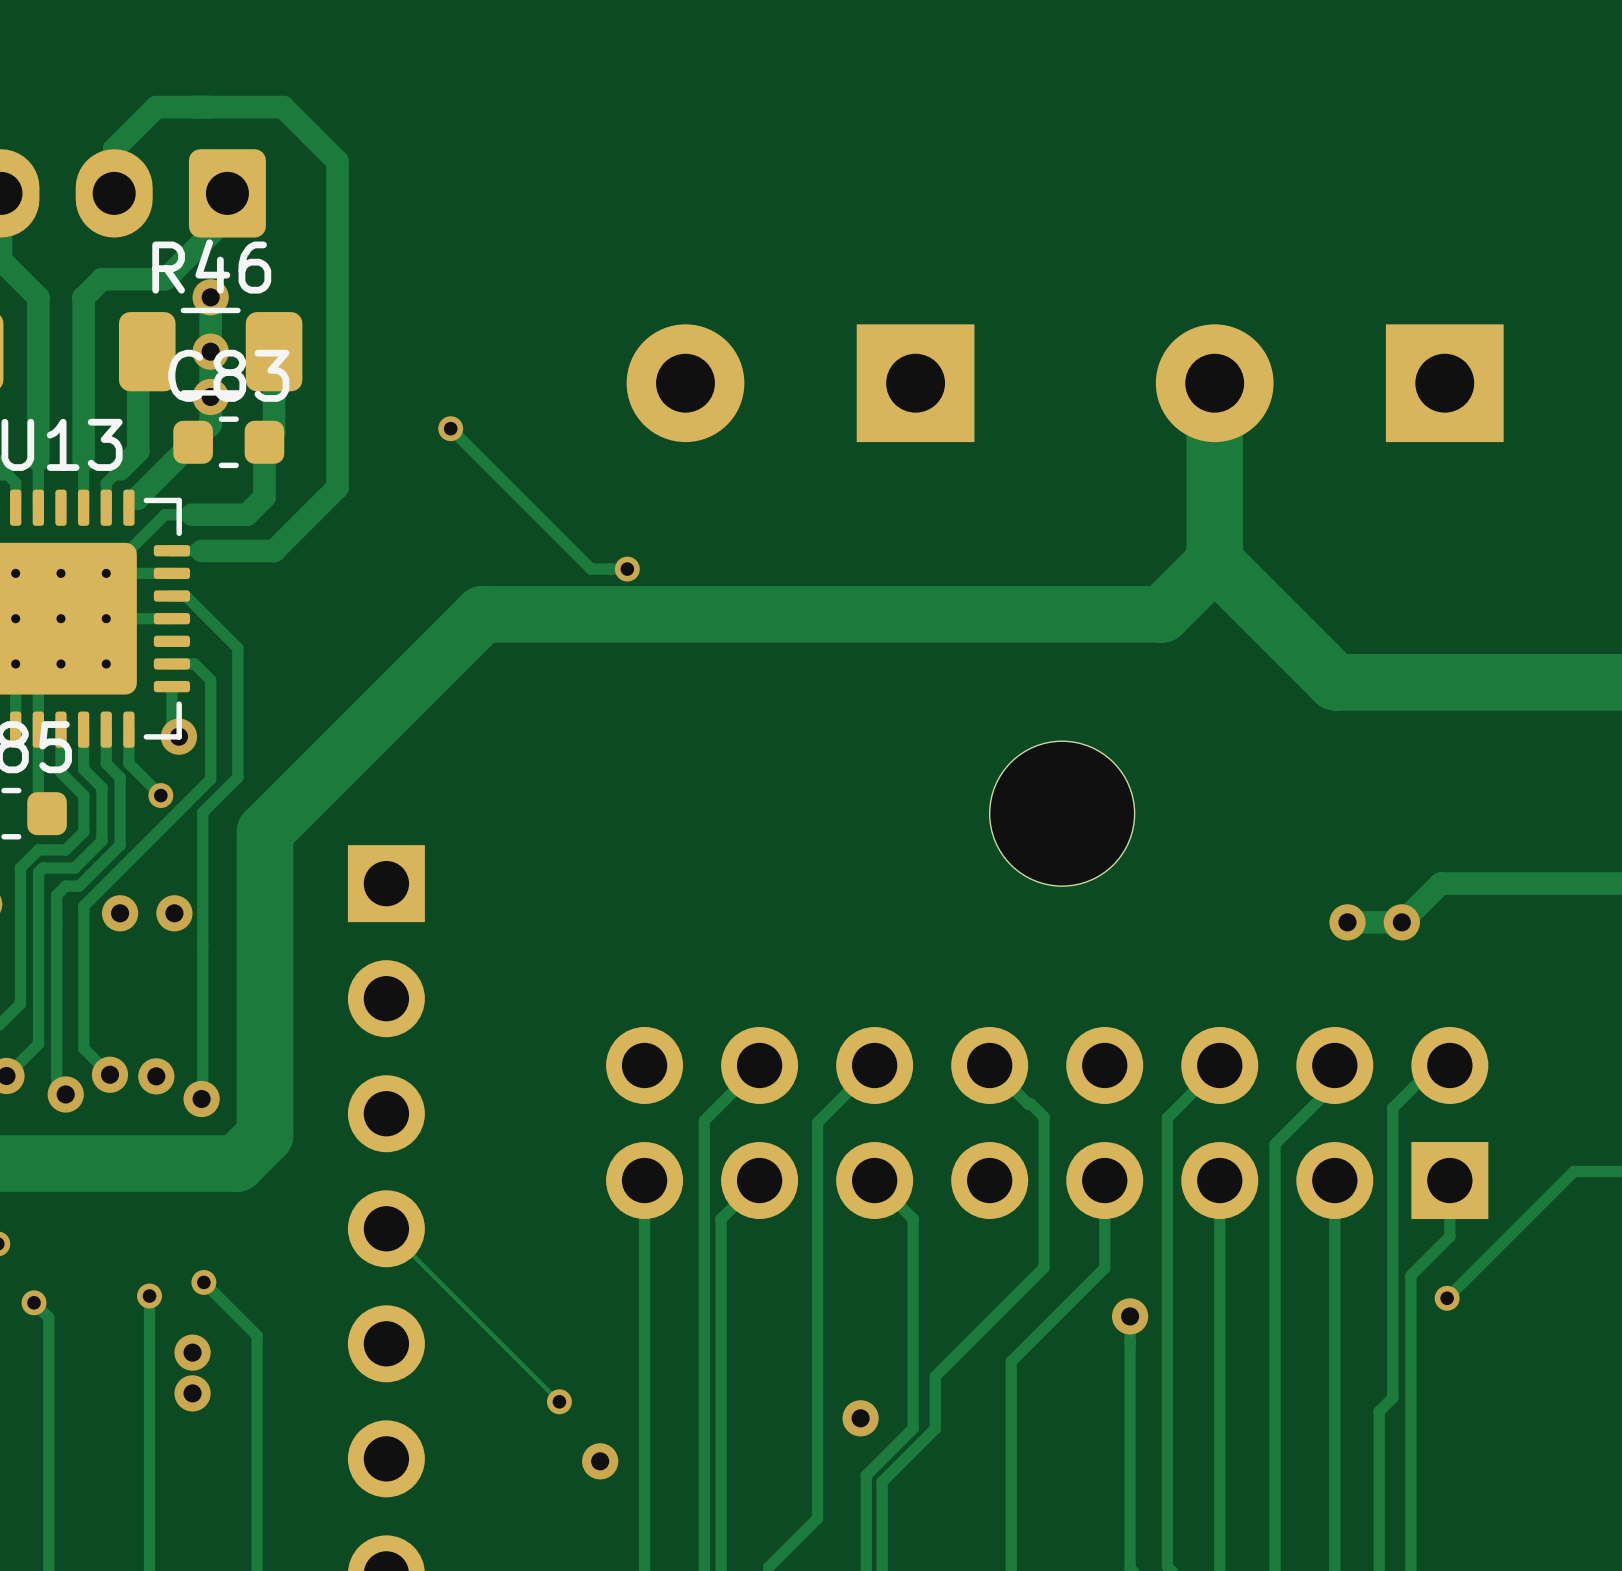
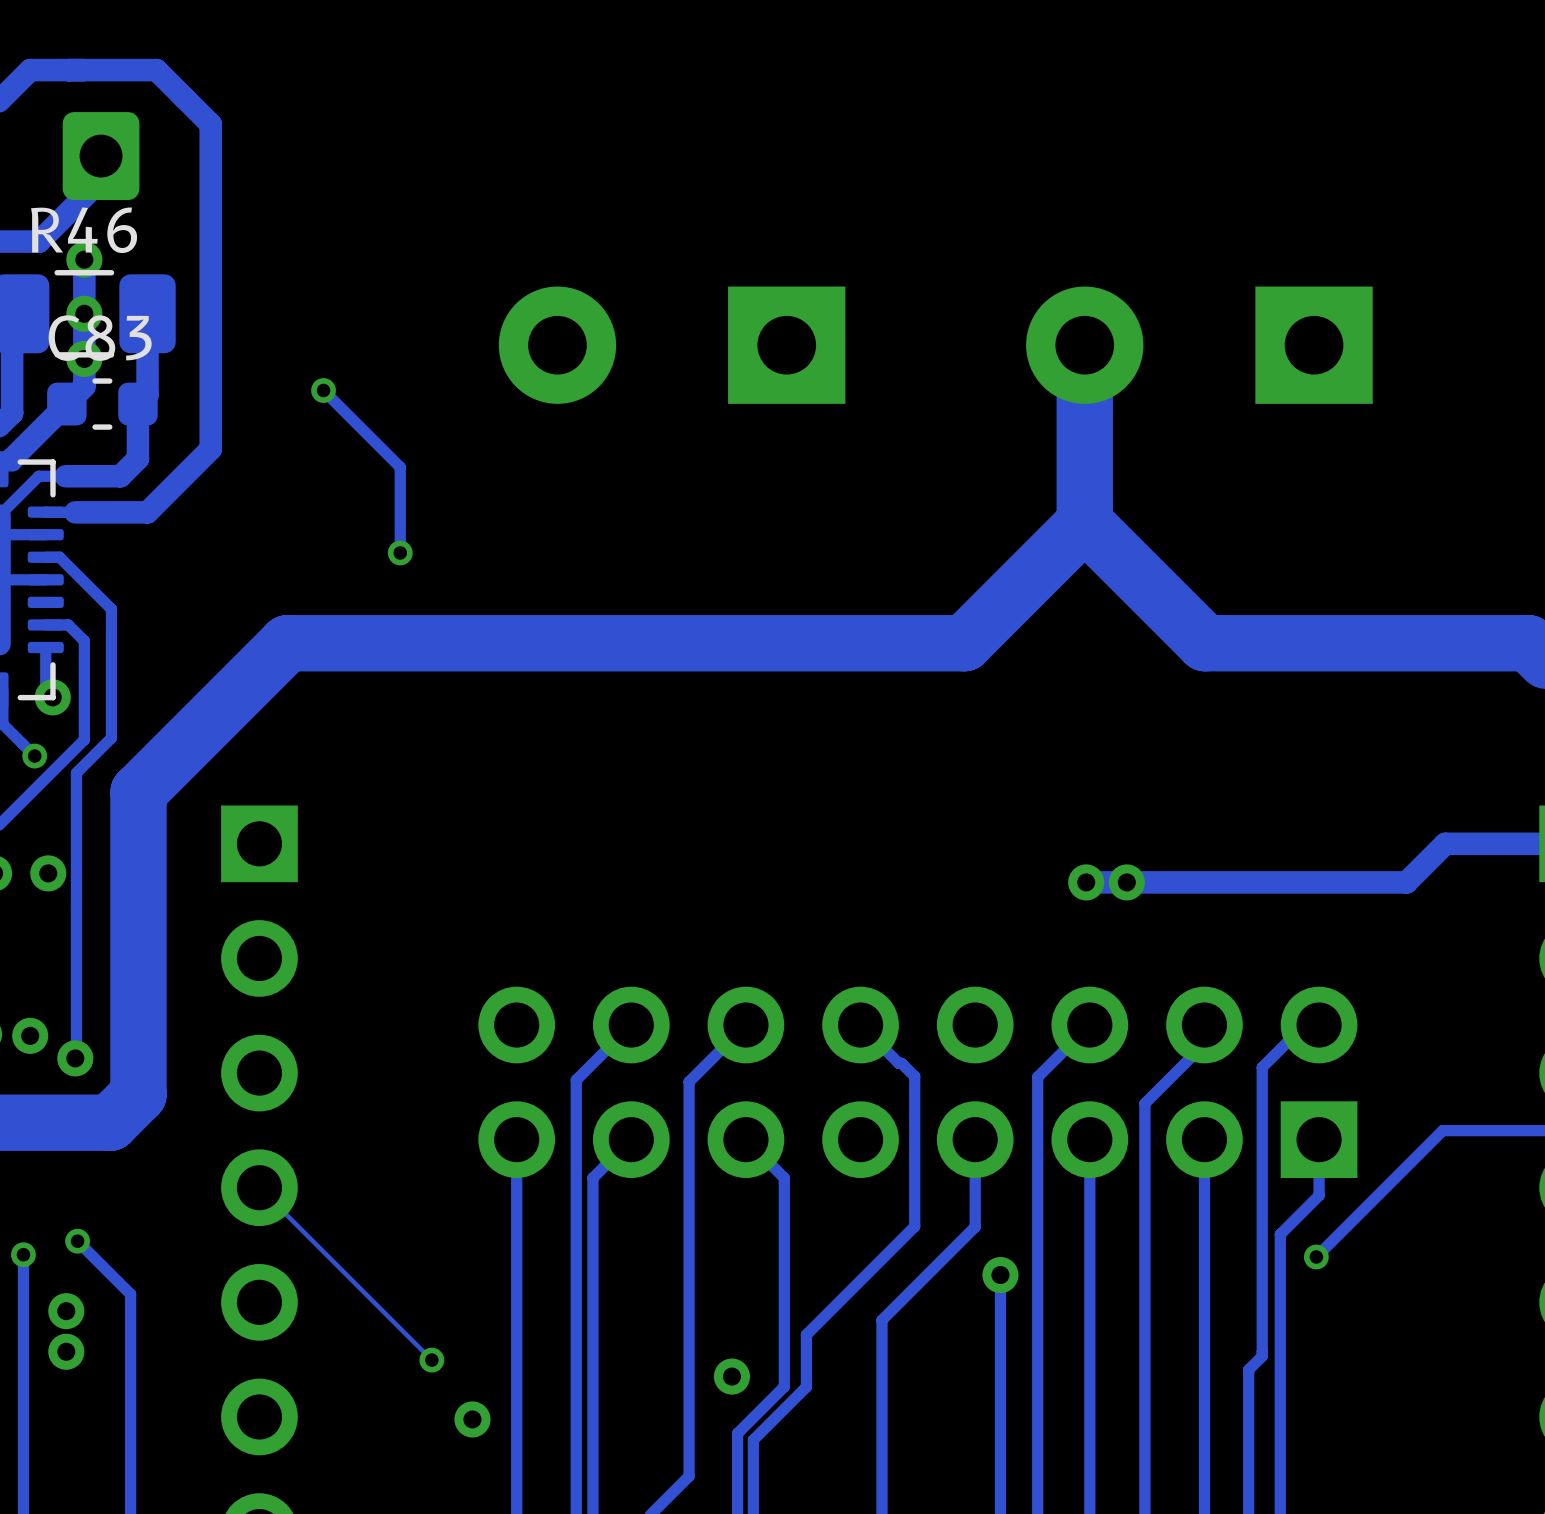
track: (527, 505) (591, 569) (627, 569) -> (400, 467) (400, 552)
via position: (627, 569) -> (400, 552)
track: (1161, 614) (482, 614) (414, 682) -> (1032, 575) (964, 643) (287, 643)
part: (1062, 813) -> none
track: (1576, 883) (1440, 883) (1401, 922) -> (1445, 843) (1406, 882) (1271, 882)
via: none -> (1086, 882)
via: none -> (1126, 882)
track: none -> (1217, 882) (1086, 882)
via: (1347, 922) -> none
via: (1401, 922) -> none

